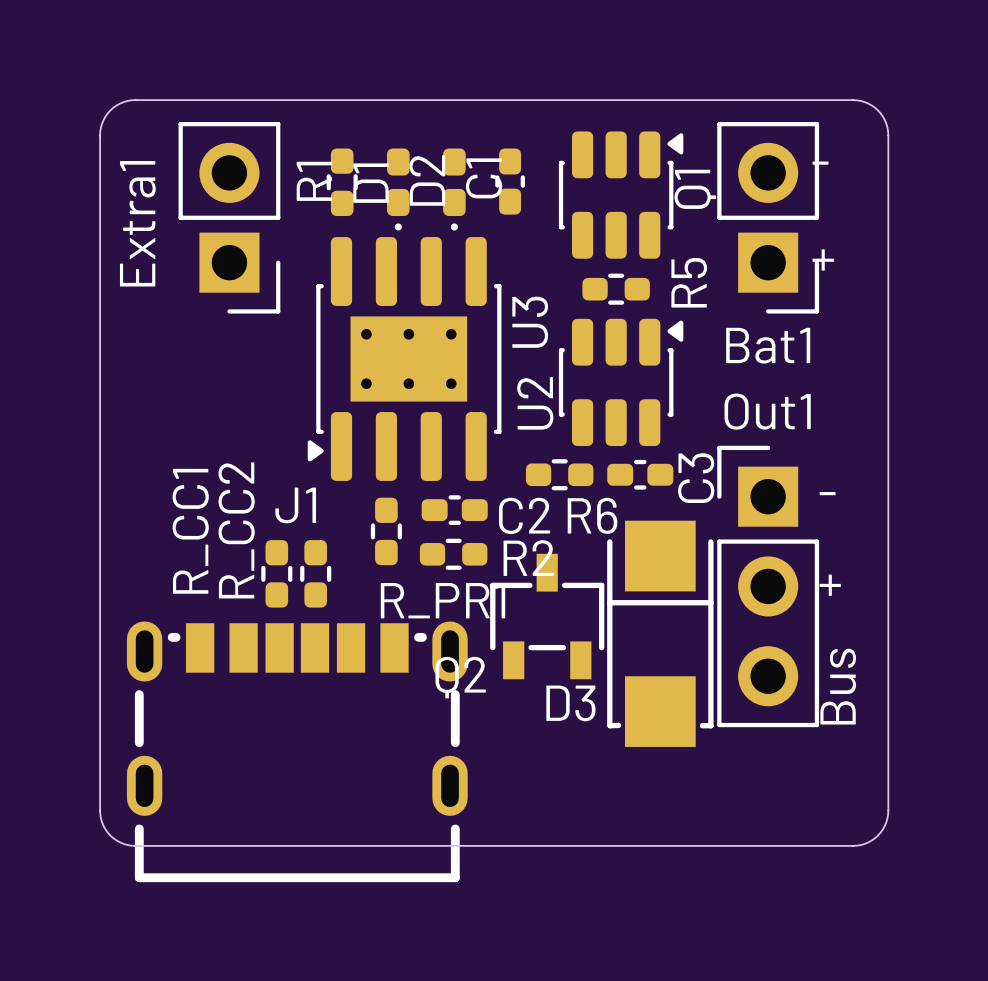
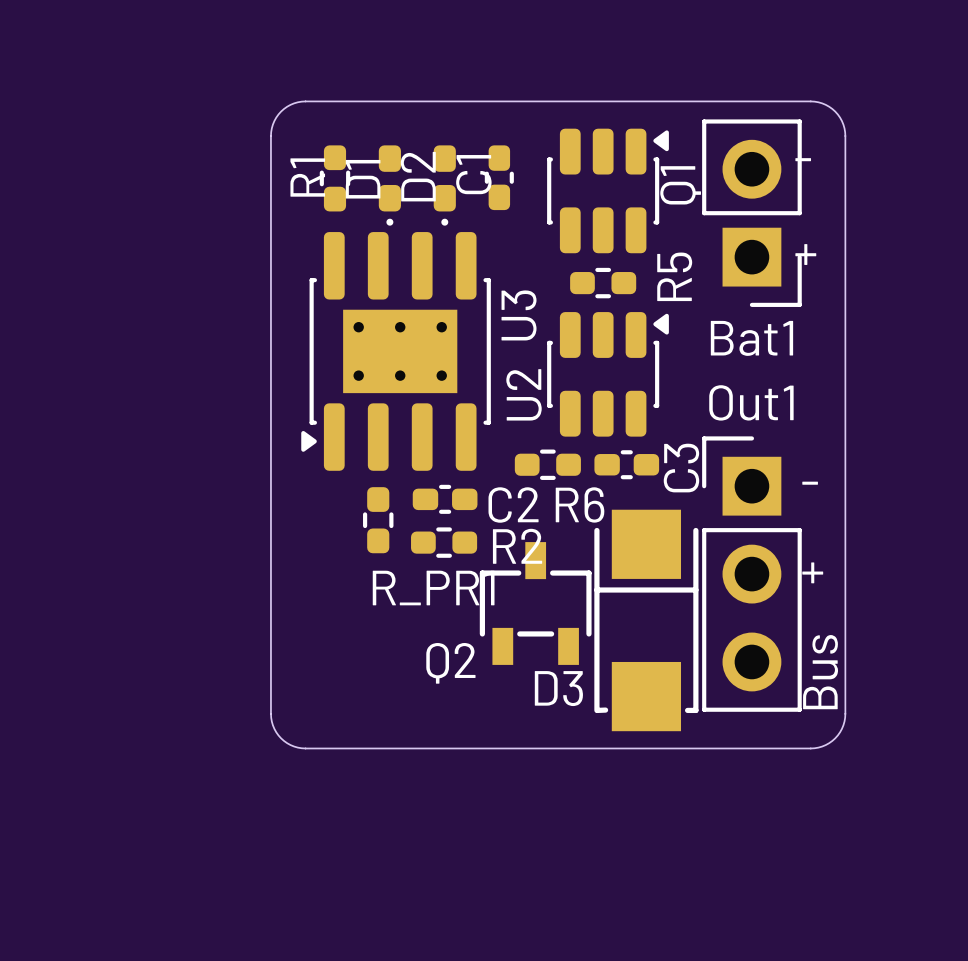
board edge: (135, 100) (852, 100) (864, 102) (877, 110) (884, 120) (888, 135) (888, 810) (886, 822) (877, 835) (868, 842) (852, 845) (135, 845) (120, 842) (110, 835) (102, 822) (100, 810) (100, 135) (103, 120) (110, 110) (120, 103) (135, 100) -> (305, 101) (294, 103) (281, 111) (274, 121) (270, 136) (270, 713) (272, 725) (278, 735) (290, 745) (305, 748) (810, 748) (822, 746) (832, 740) (841, 728) (845, 713) (845, 136) (843, 124) (837, 114) (825, 104) (810, 101) (305, 101)
Extra1: (229, 217) -> none
R_CC1: (276, 573) -> none
R_CC2: (315, 573) -> none
J1: (297, 751) -> none

